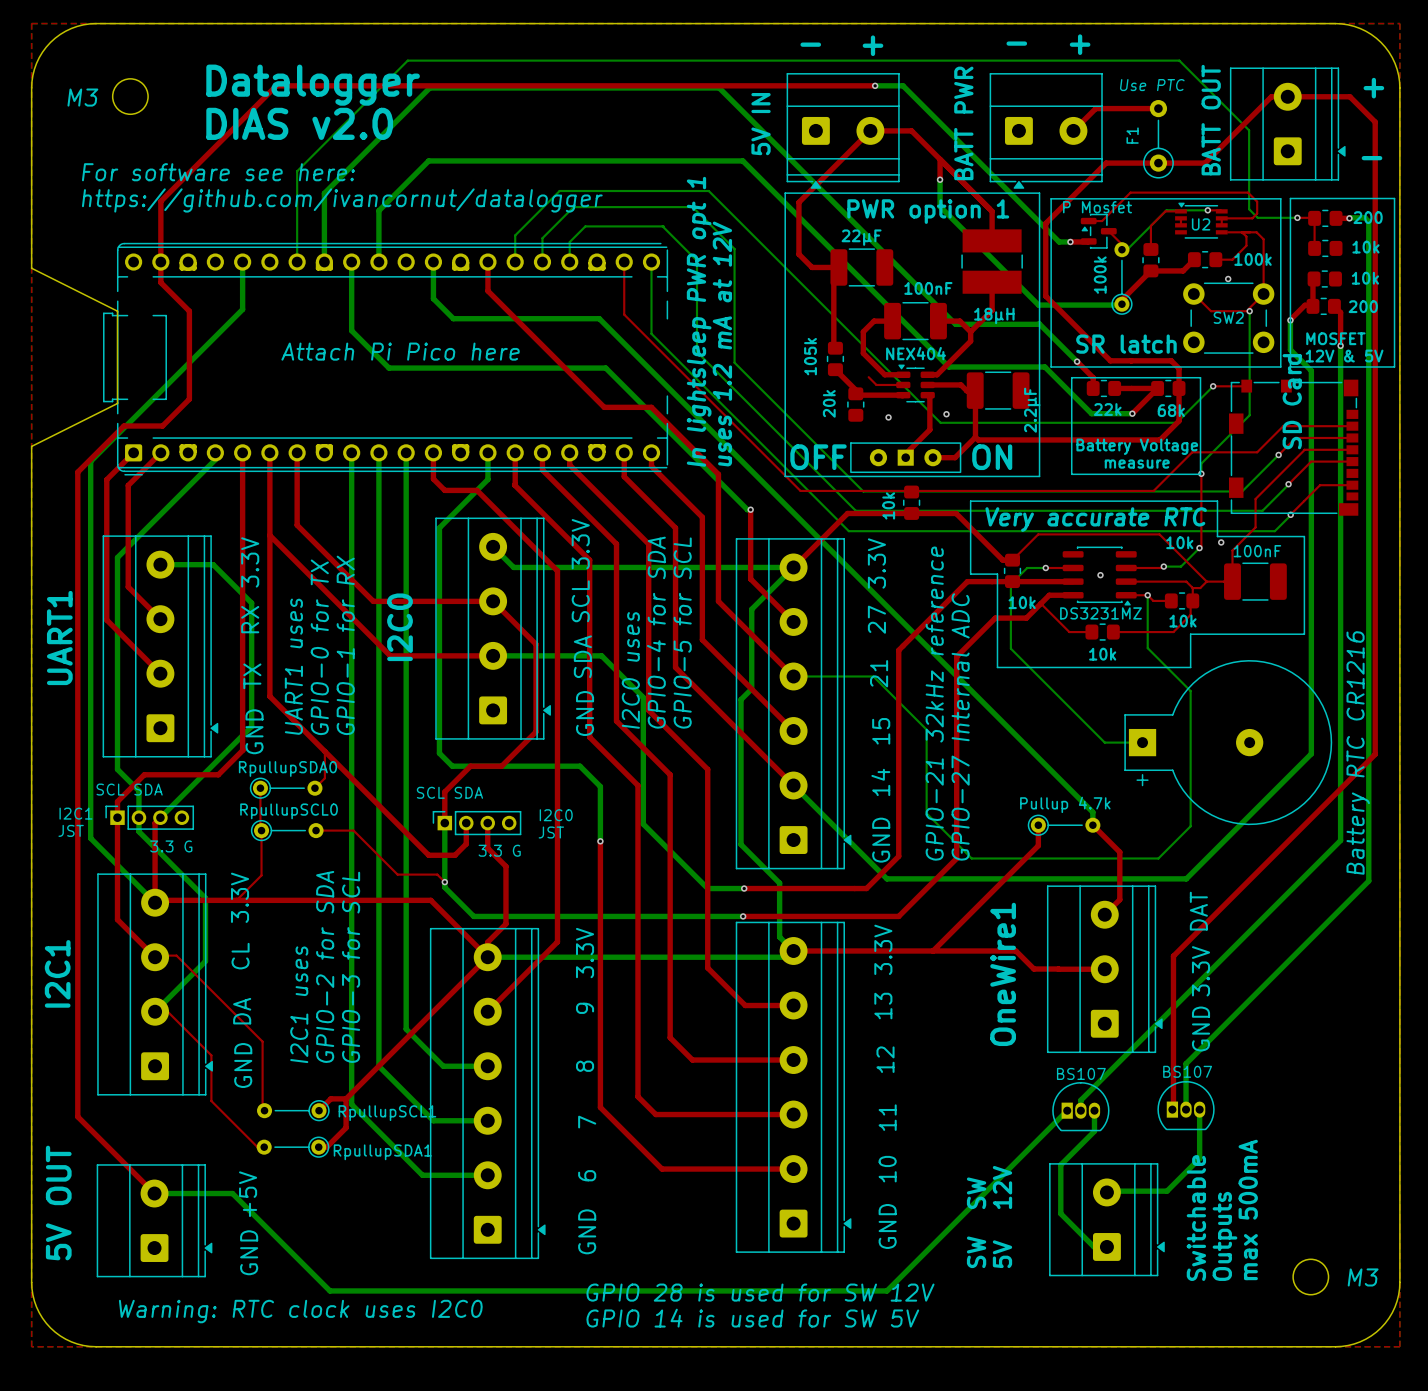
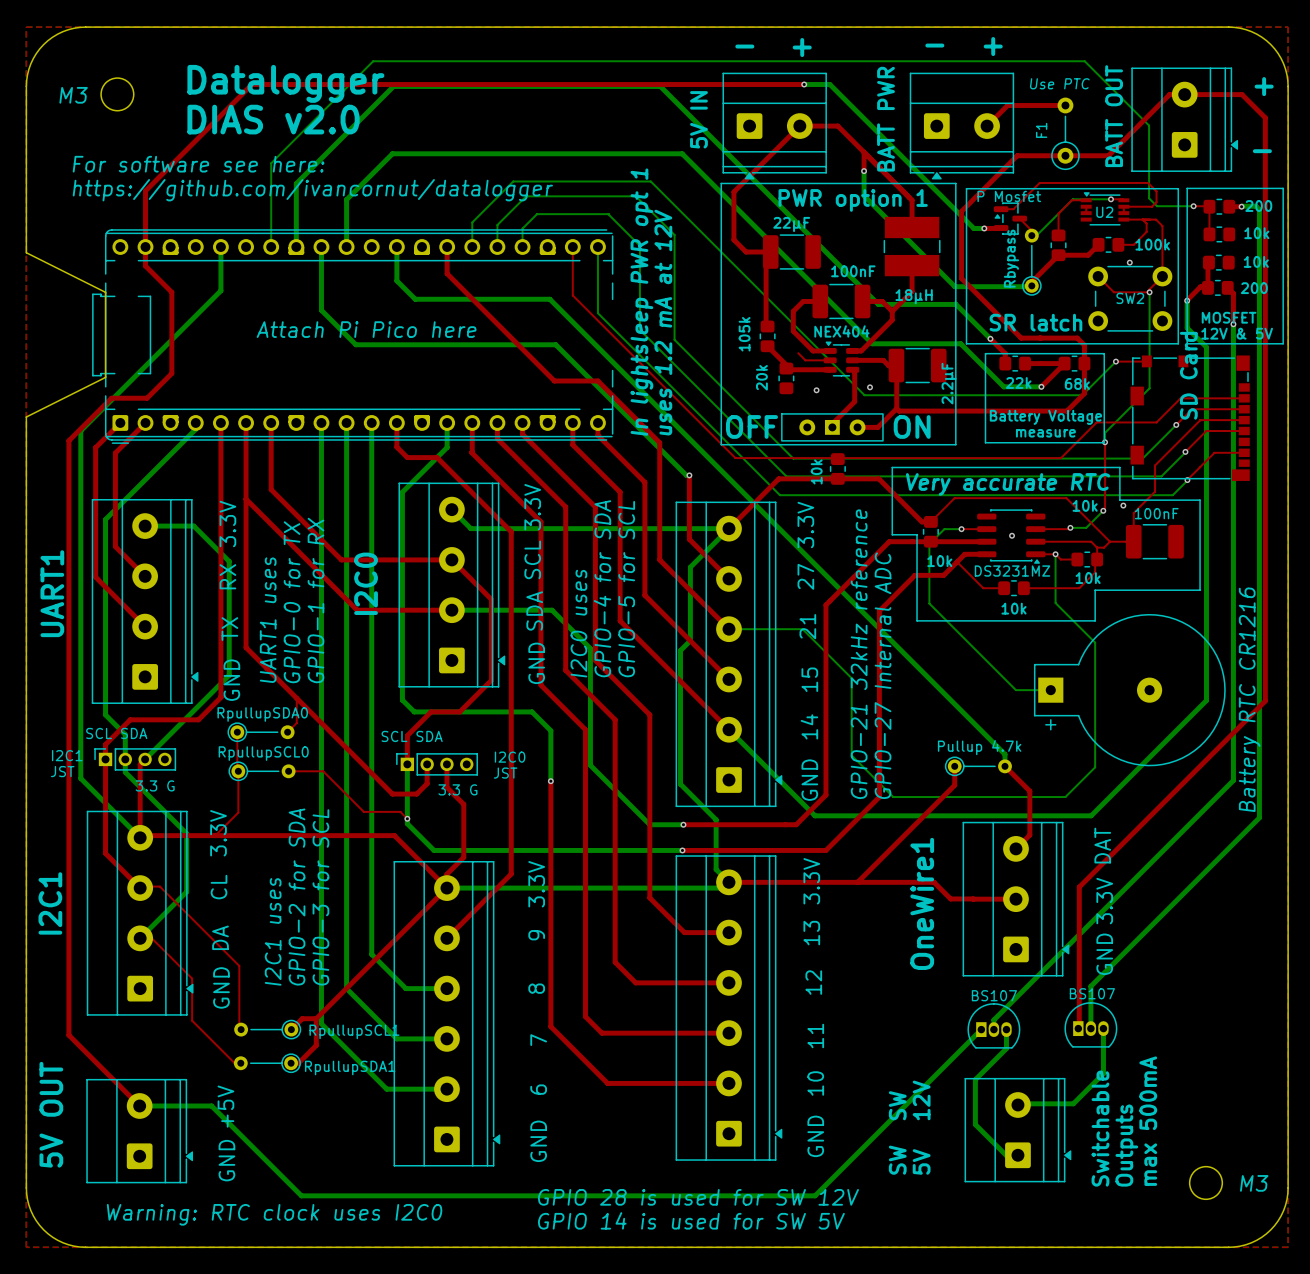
text: none -> Rbypass (1011, 258)
text: 100k (1100, 275) -> none

